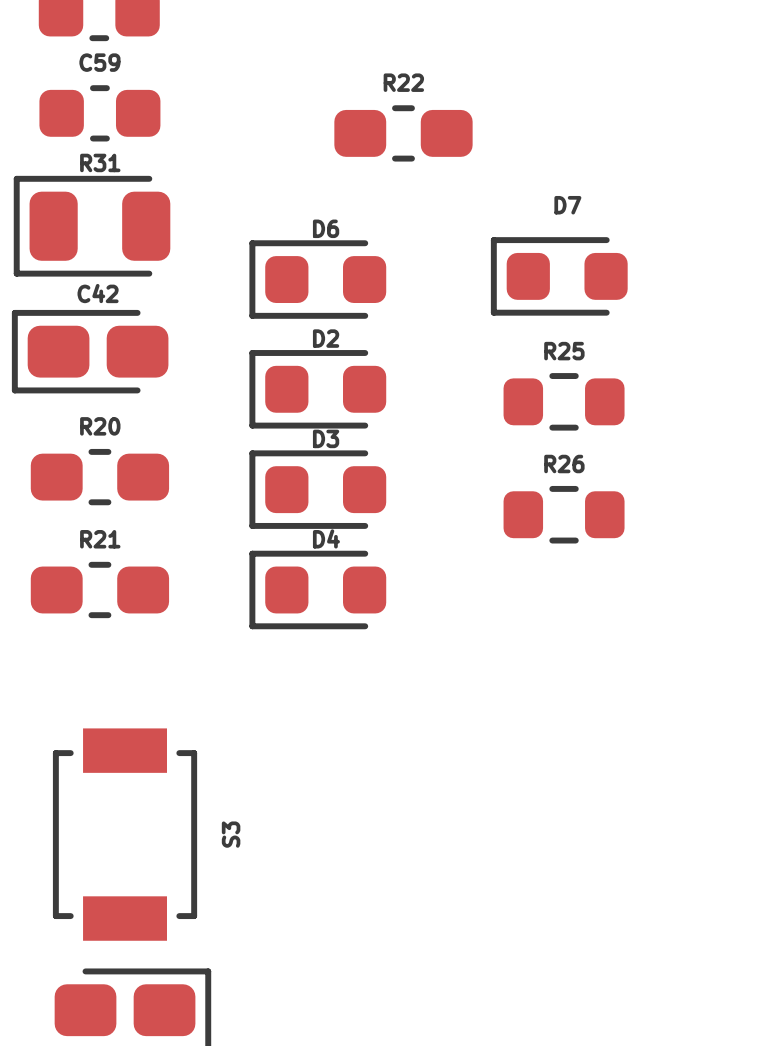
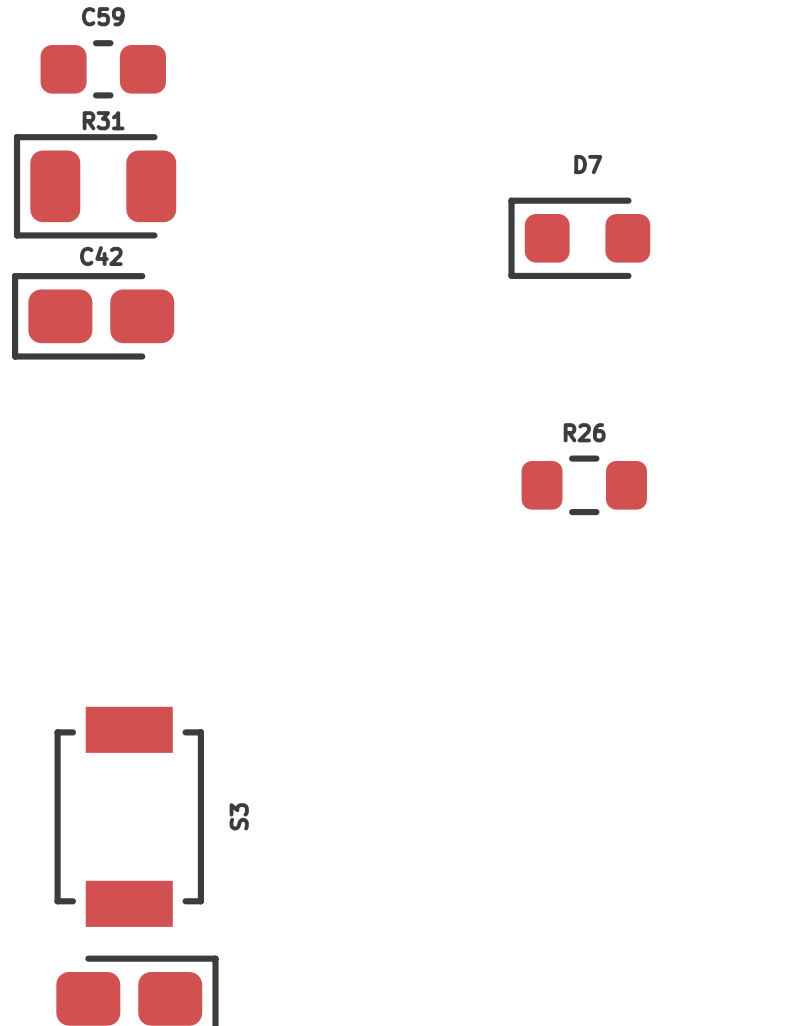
R22: (403, 133) -> none
D6: (317, 279) -> none
D2: (317, 389) -> none
R25: (564, 401) -> none
R20: (99, 477) -> none
D3: (317, 489) -> none
R21: (99, 589) -> none
D4: (317, 589) -> none

